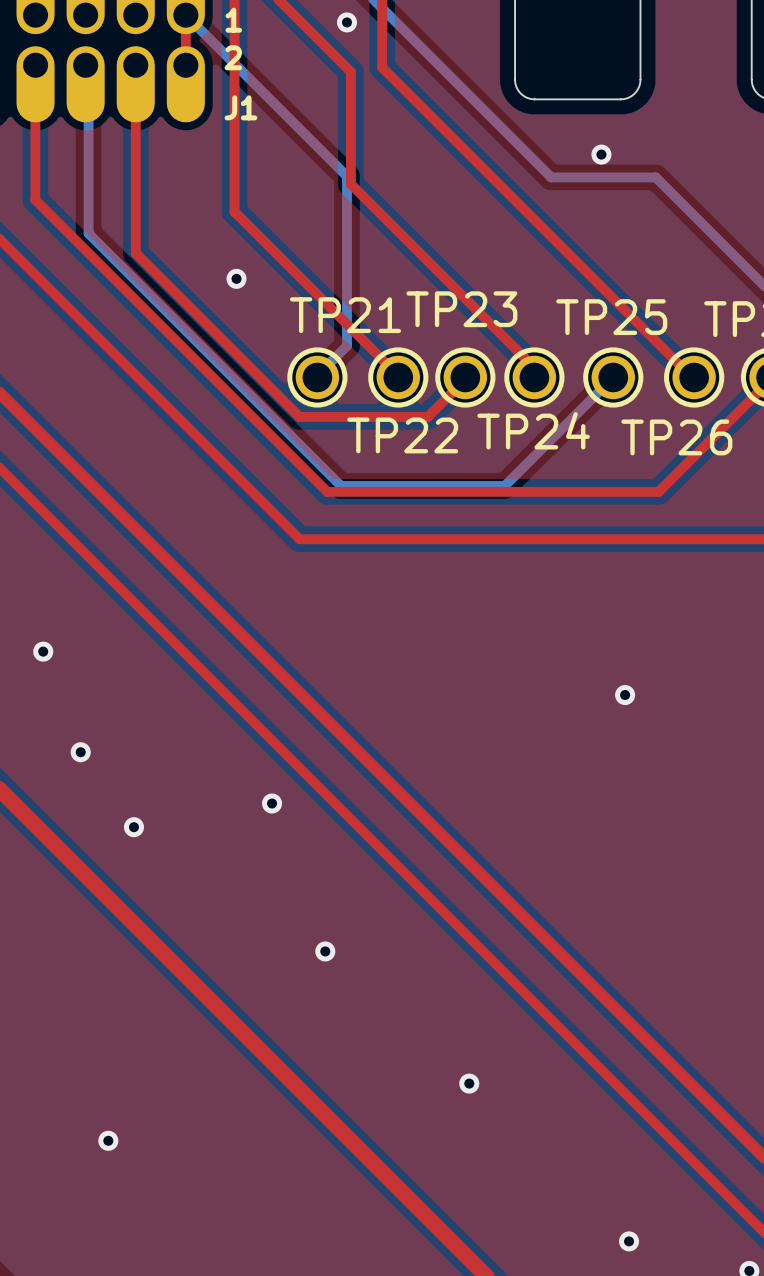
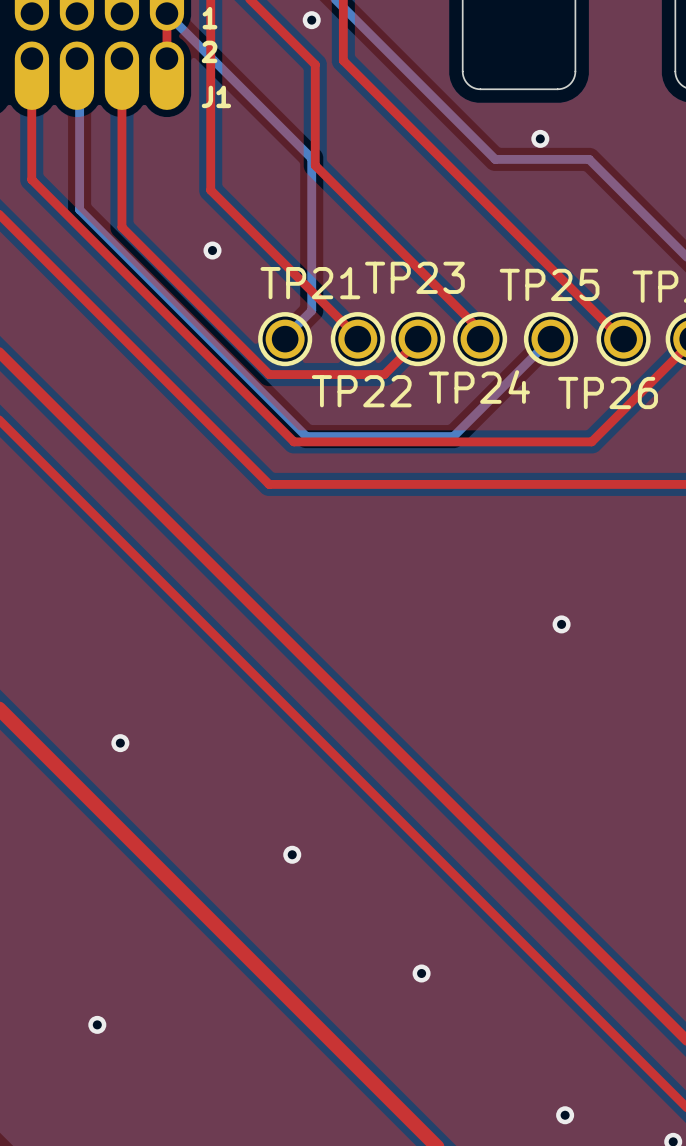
via: (43, 651) -> none
via: (80, 752) -> none
via: (272, 803) -> none

